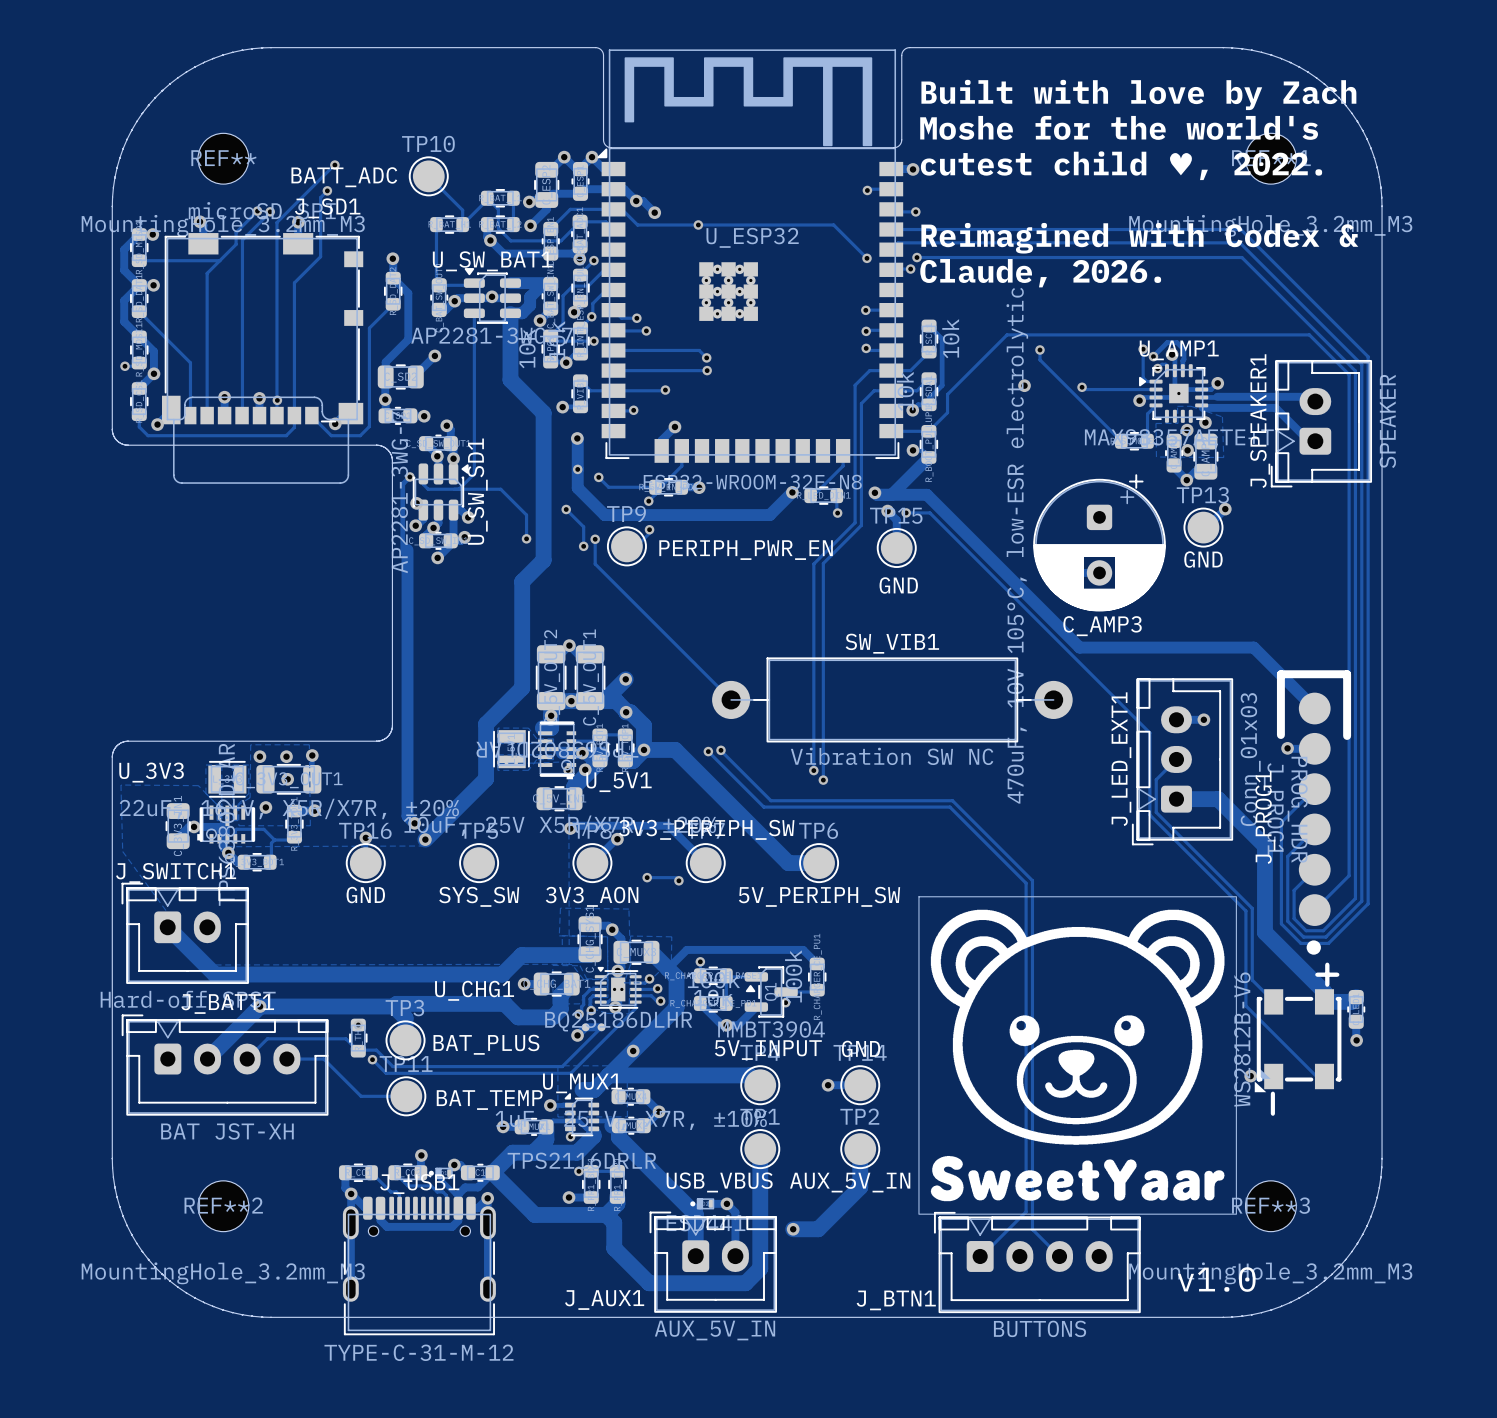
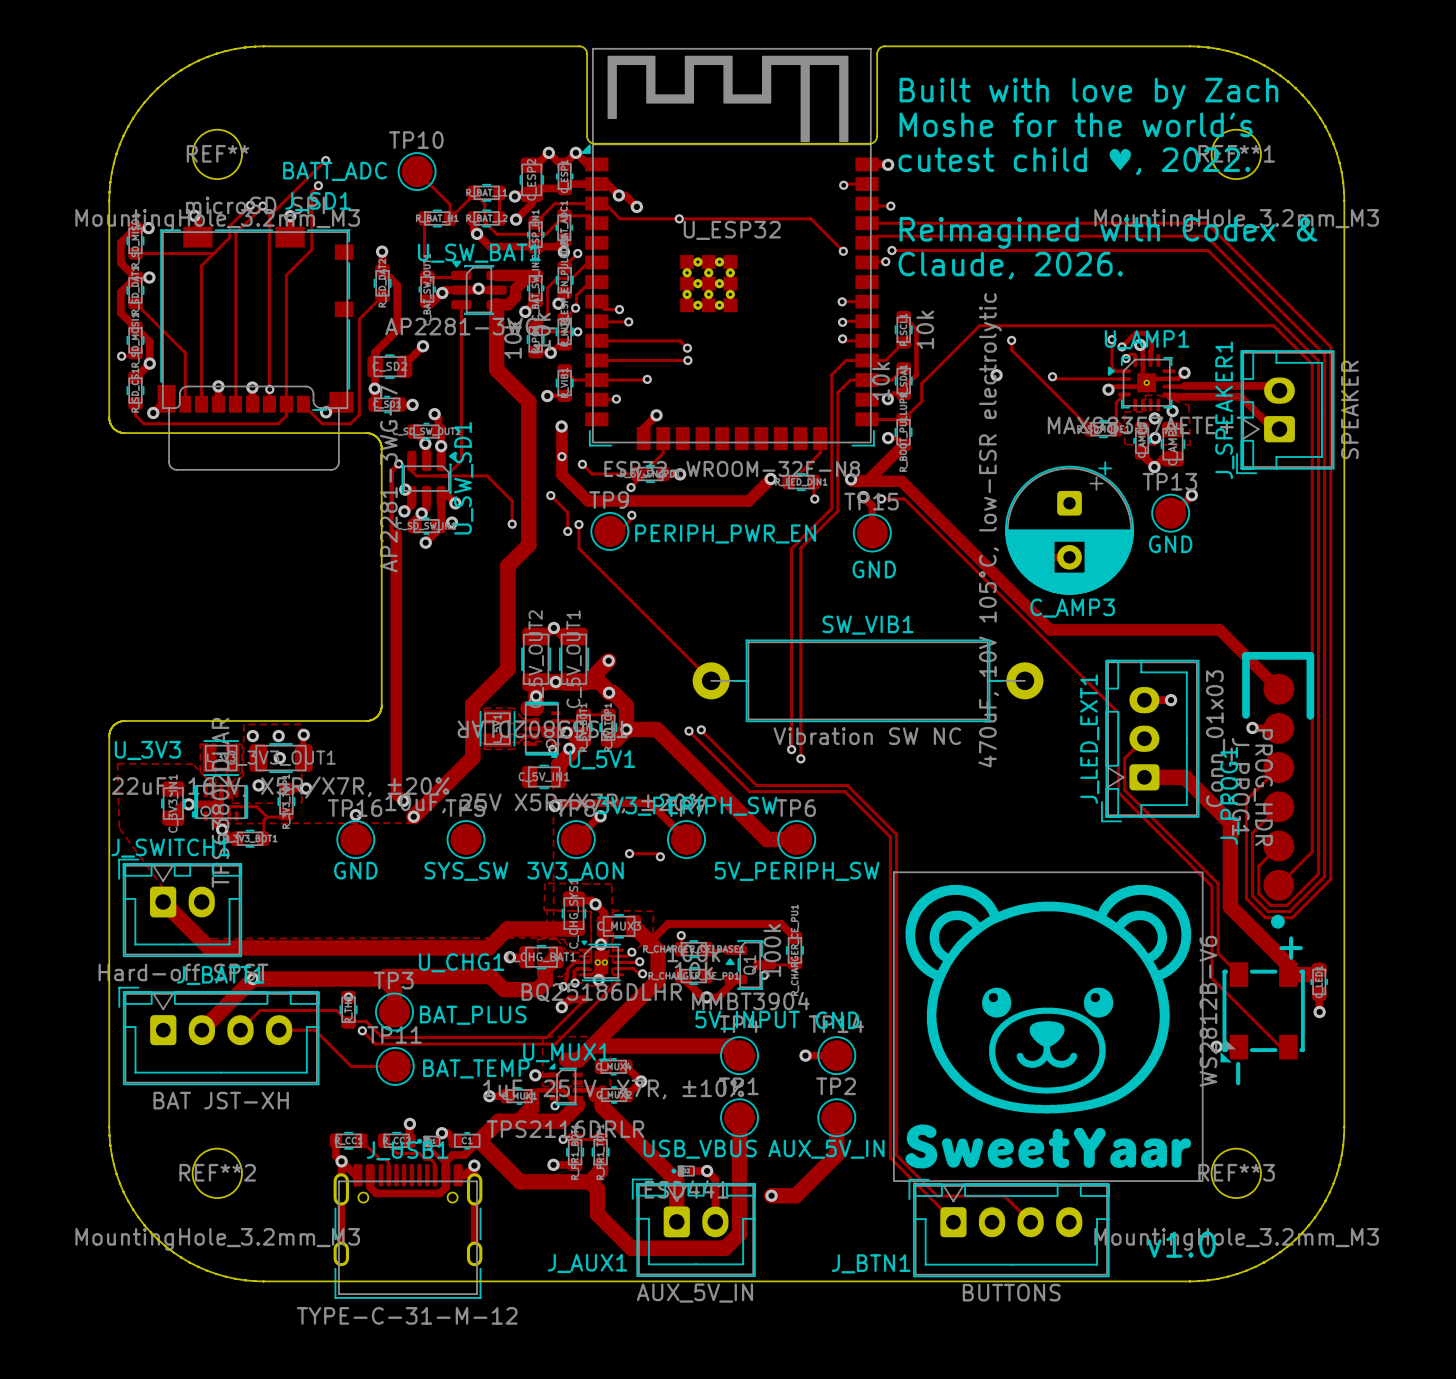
track: (770, 800) (952, 800) (1032, 880) (1032, 1229) -> (749, 778) (756, 785) (847, 785) (896, 834) (896, 1155) (937, 1196) (1004, 1196)
track: (763, 807) (949, 807) (1026, 883) (1026, 1211) (981, 1256) -> (743, 785) (749, 791) (844, 791) (890, 837) (890, 1157) (954, 1222)
via: (633, 1051) -> none

